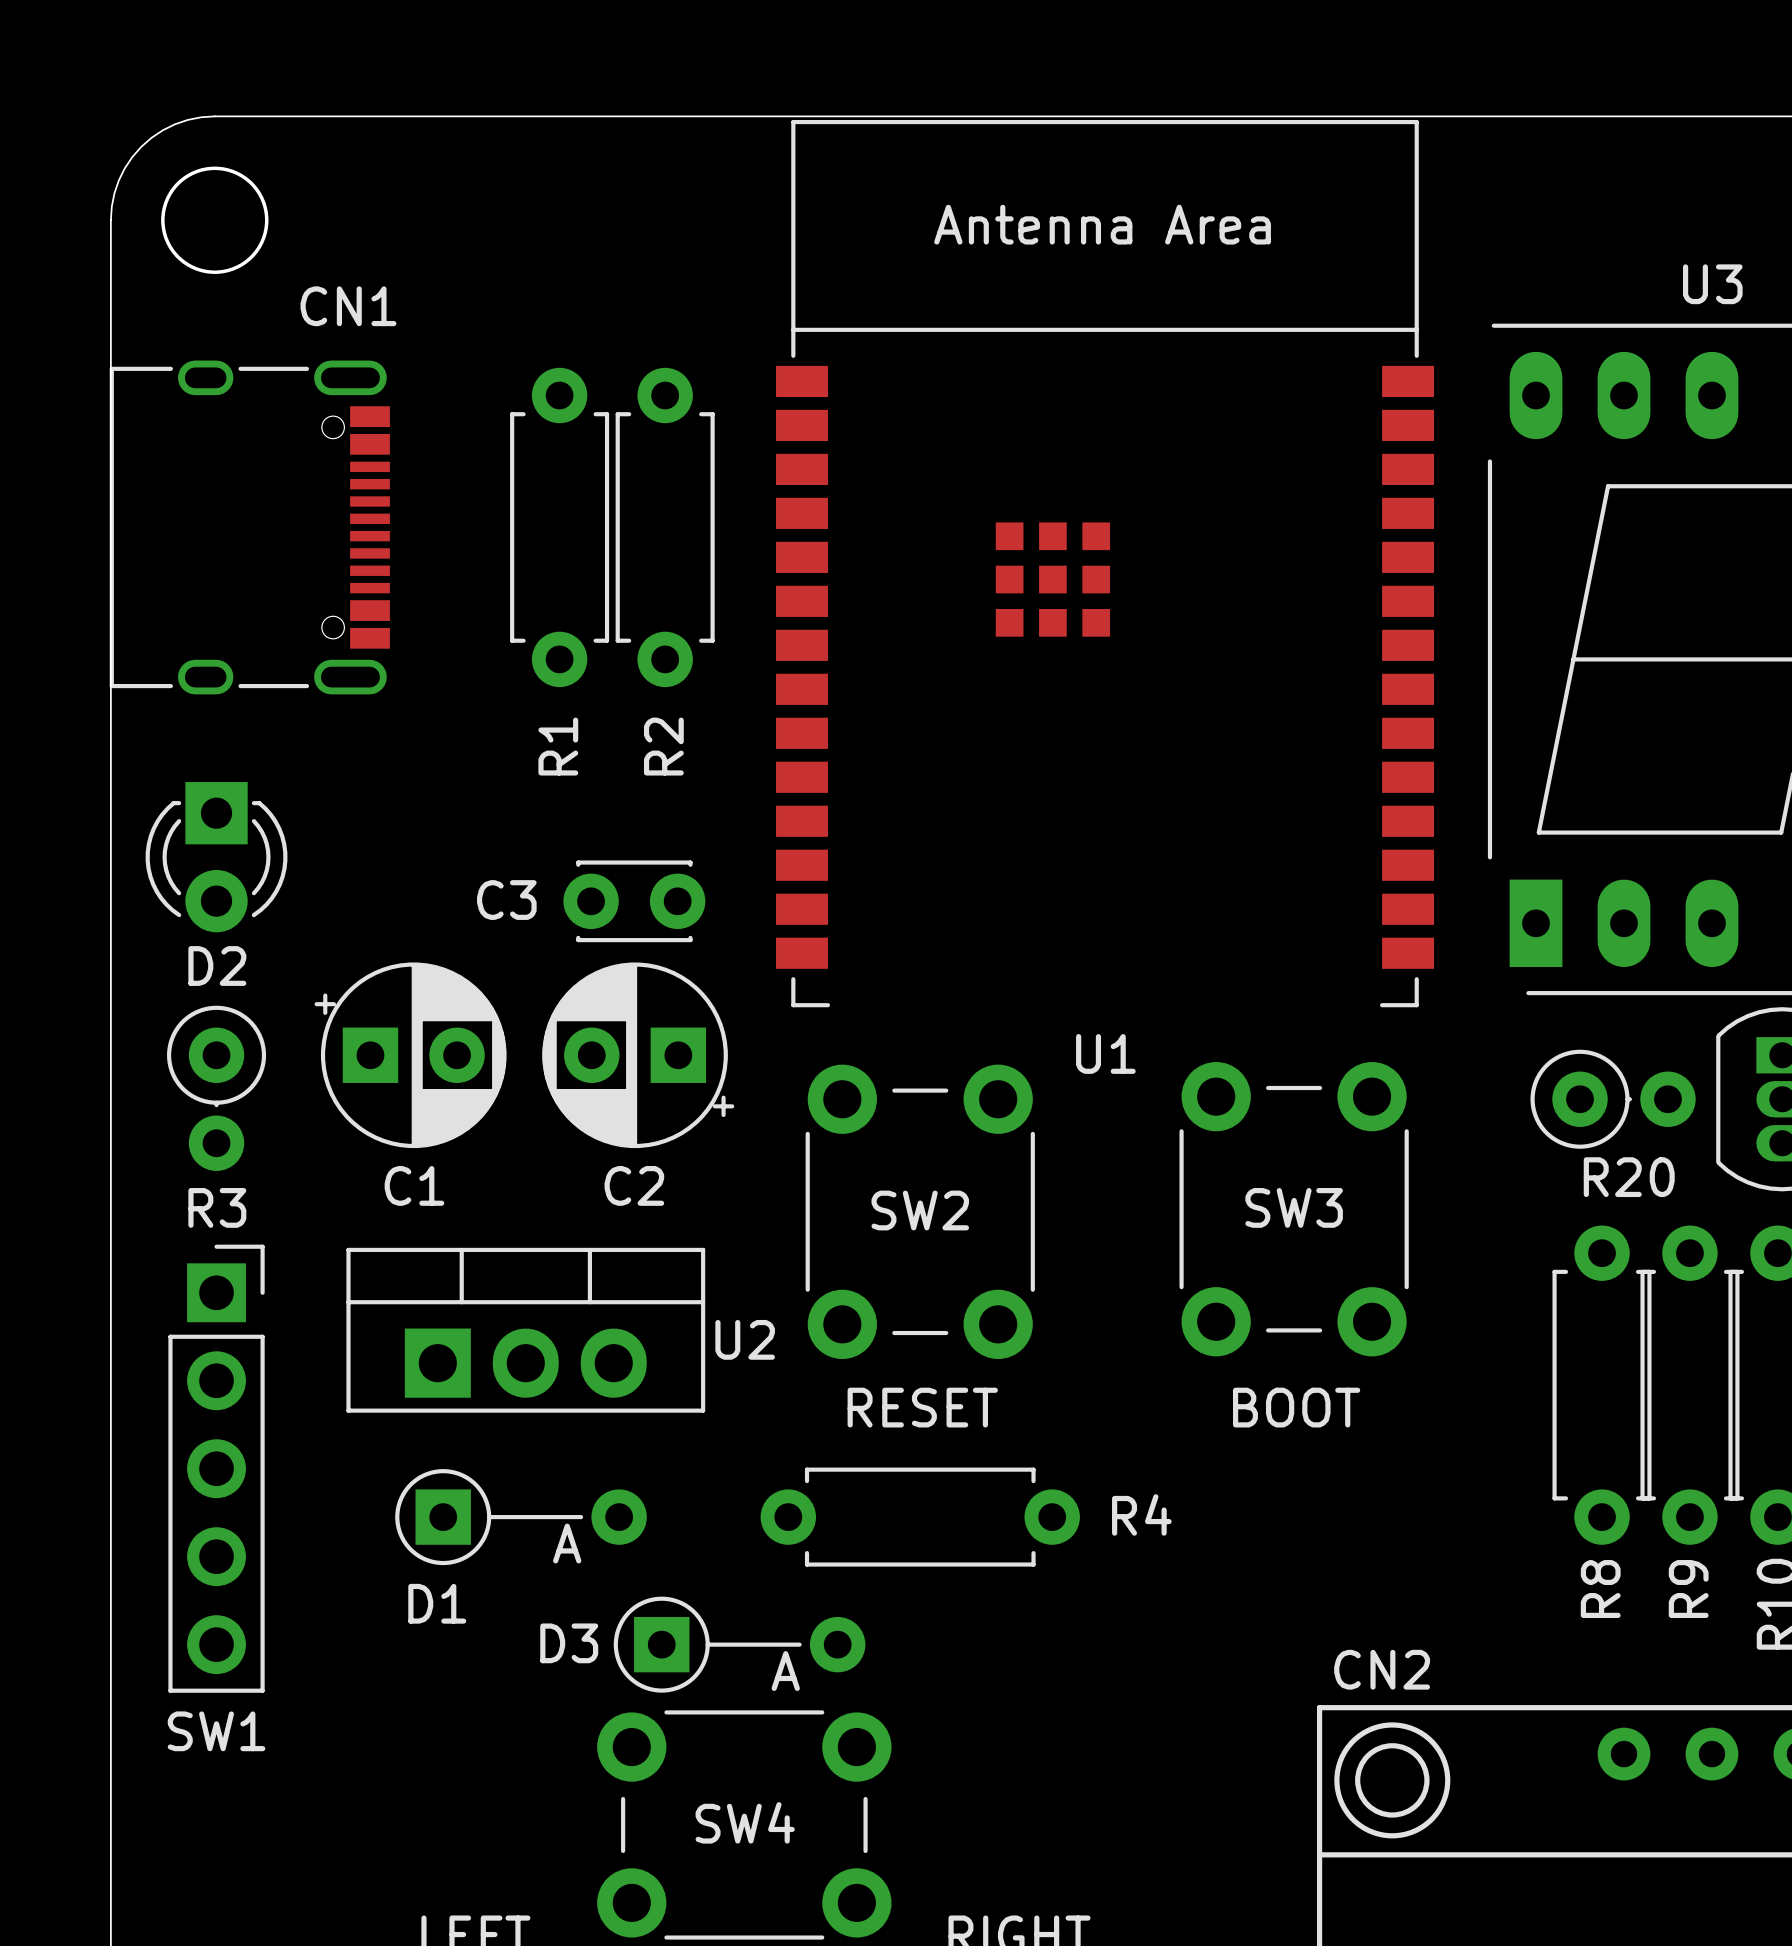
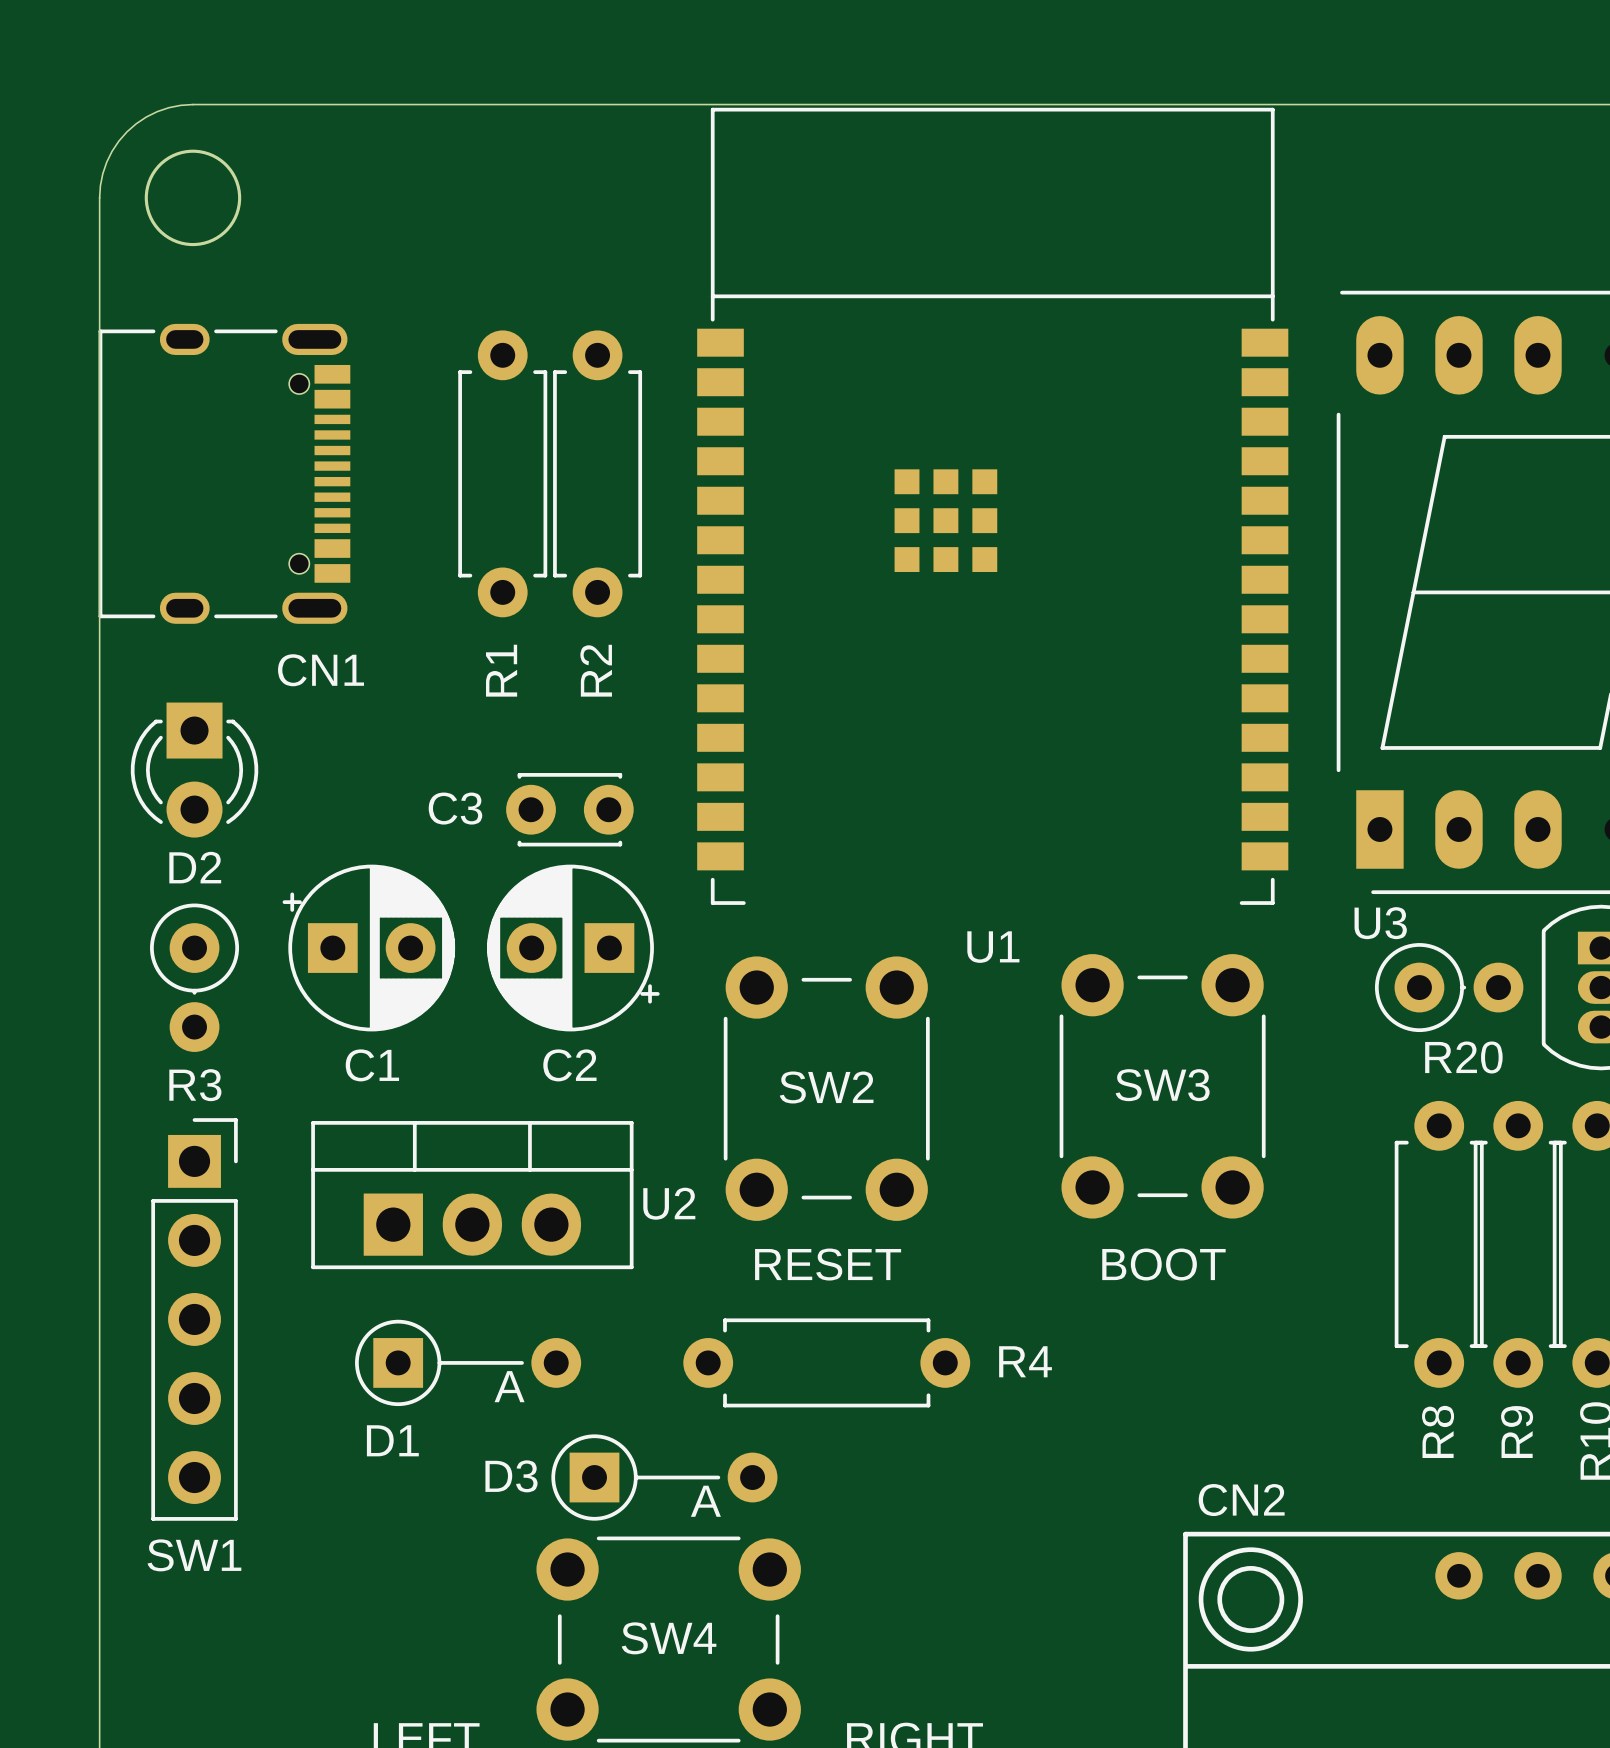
U1 text: Antenna Area (1102, 224) -> none
U3 name position: U3 (1712, 284) -> U3 (1380, 923)
CN1 name position: CN1 (348, 306) -> CN1 (321, 670)

